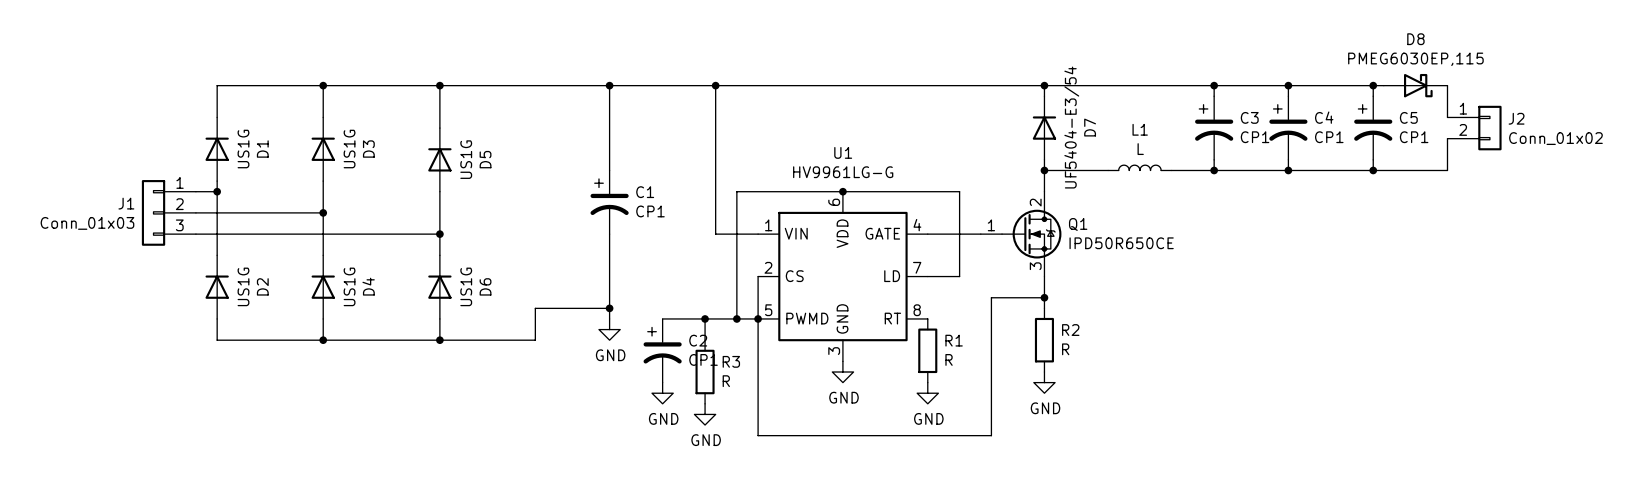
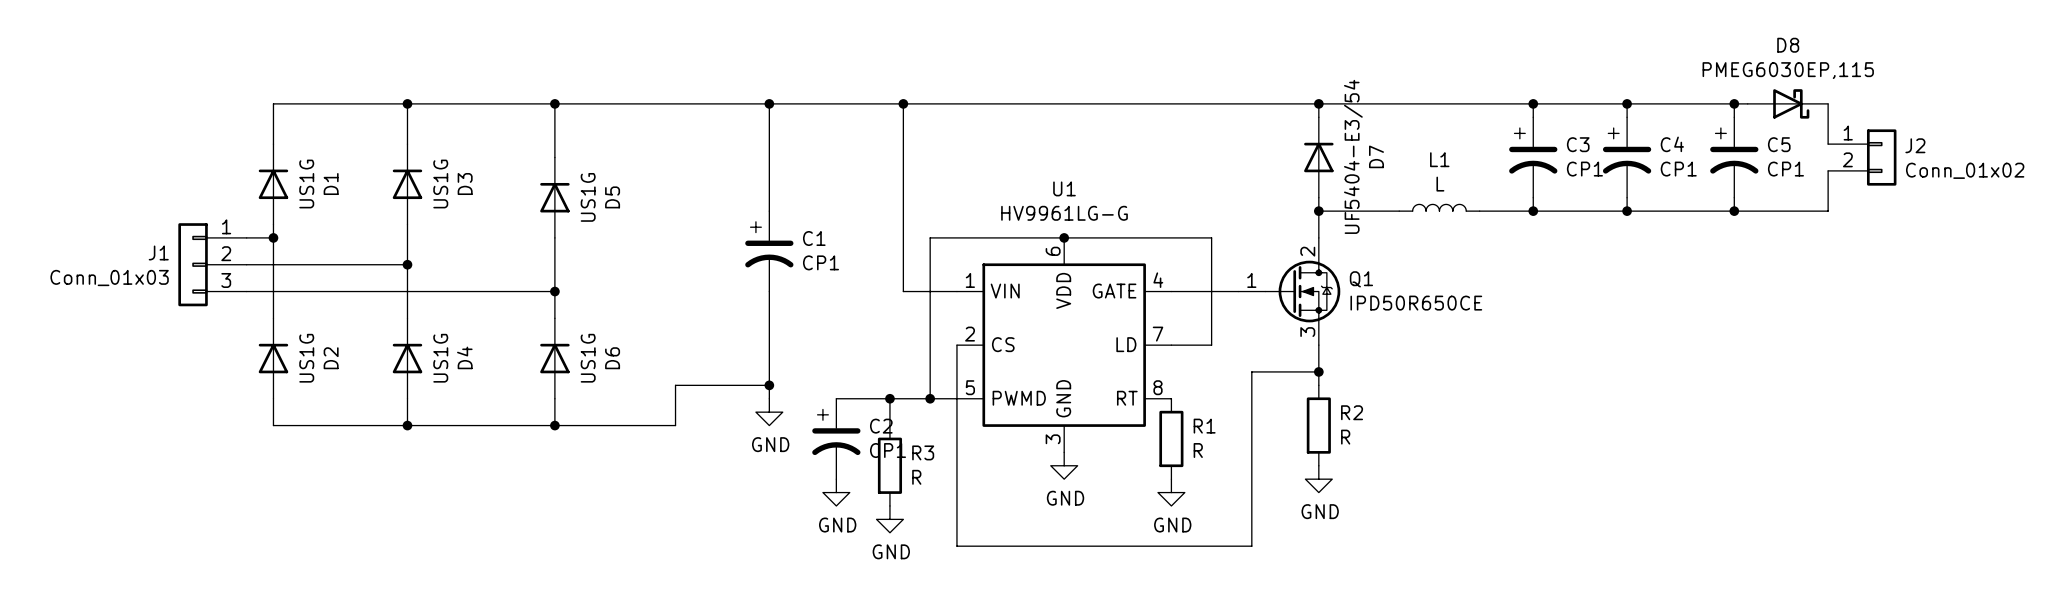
junction: (758, 318) -> none

